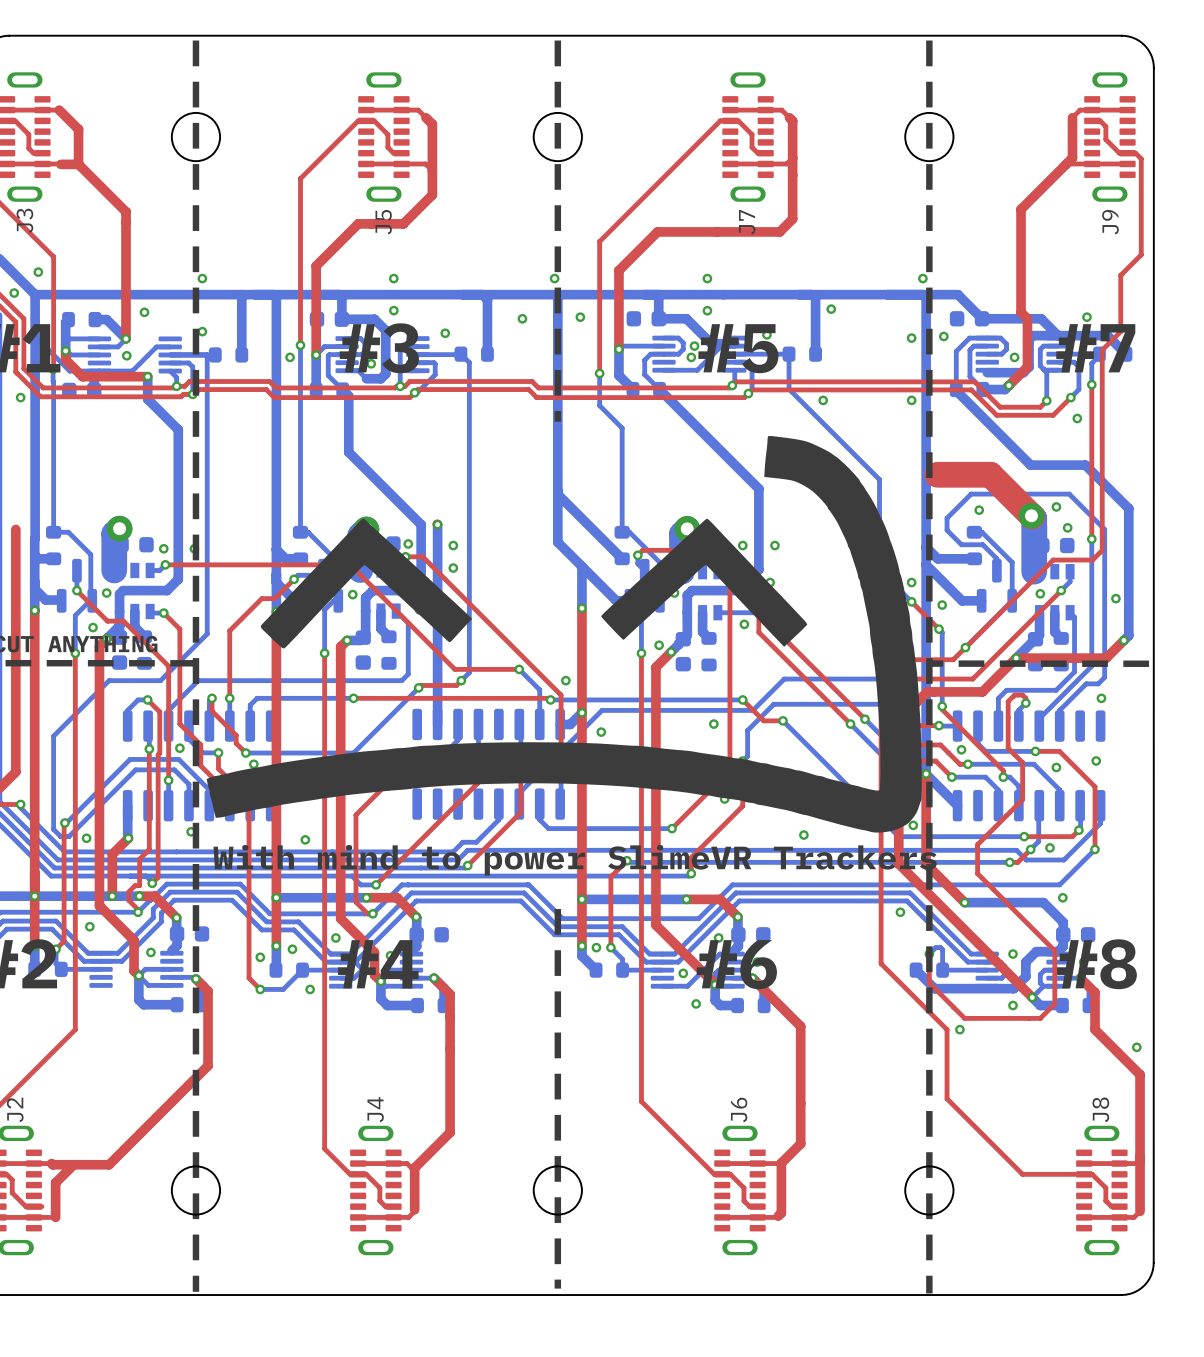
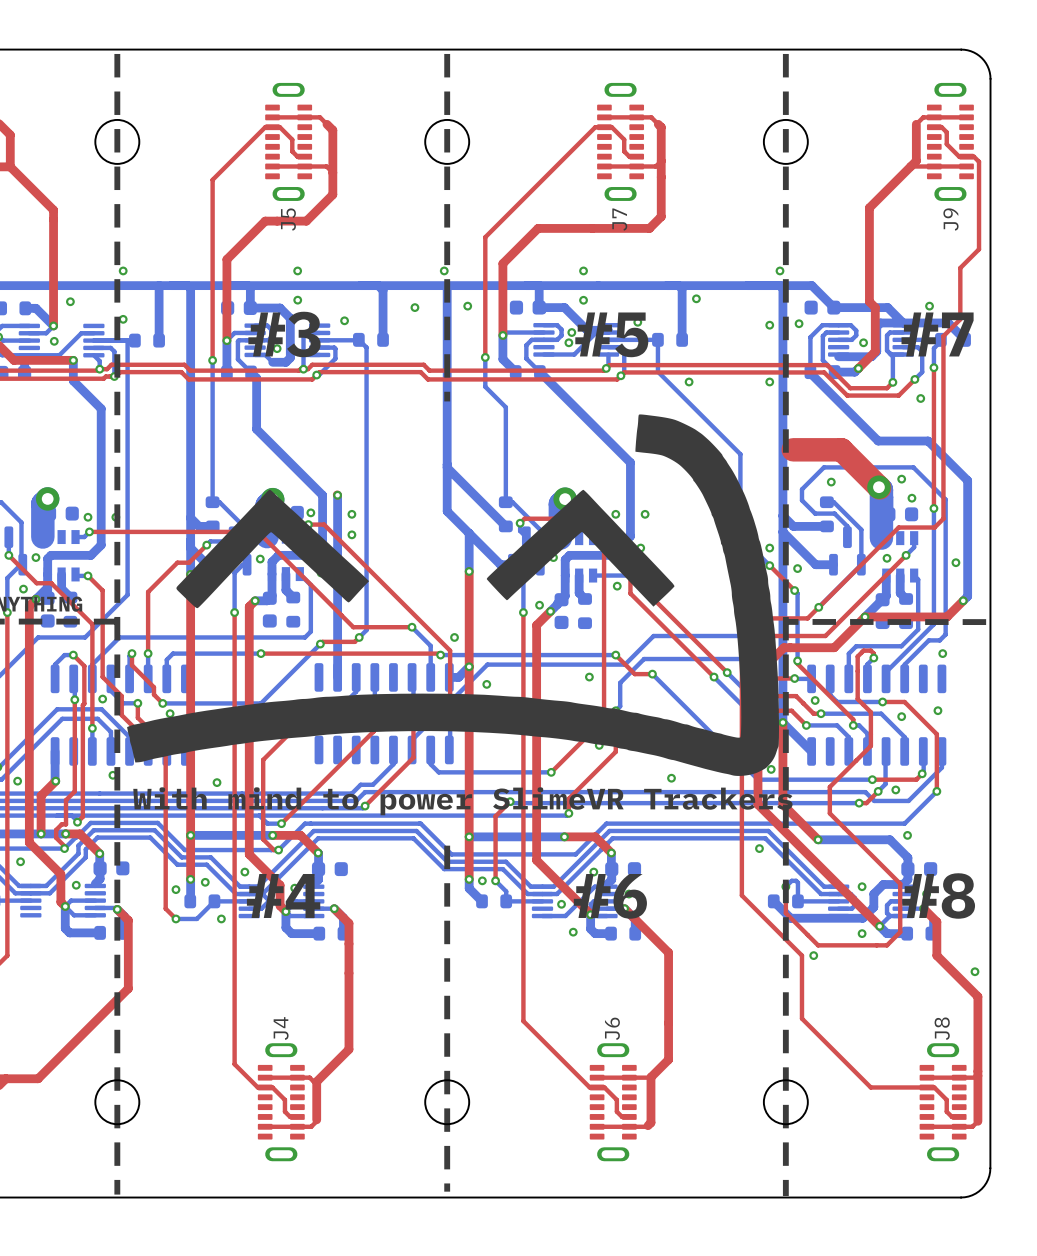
top track: none -> (212, 331) (212, 360)
bottom track: (300, 345) (300, 376) -> none
via: (300, 345) -> none
via: (290, 357) -> none
via: none -> (212, 360)

